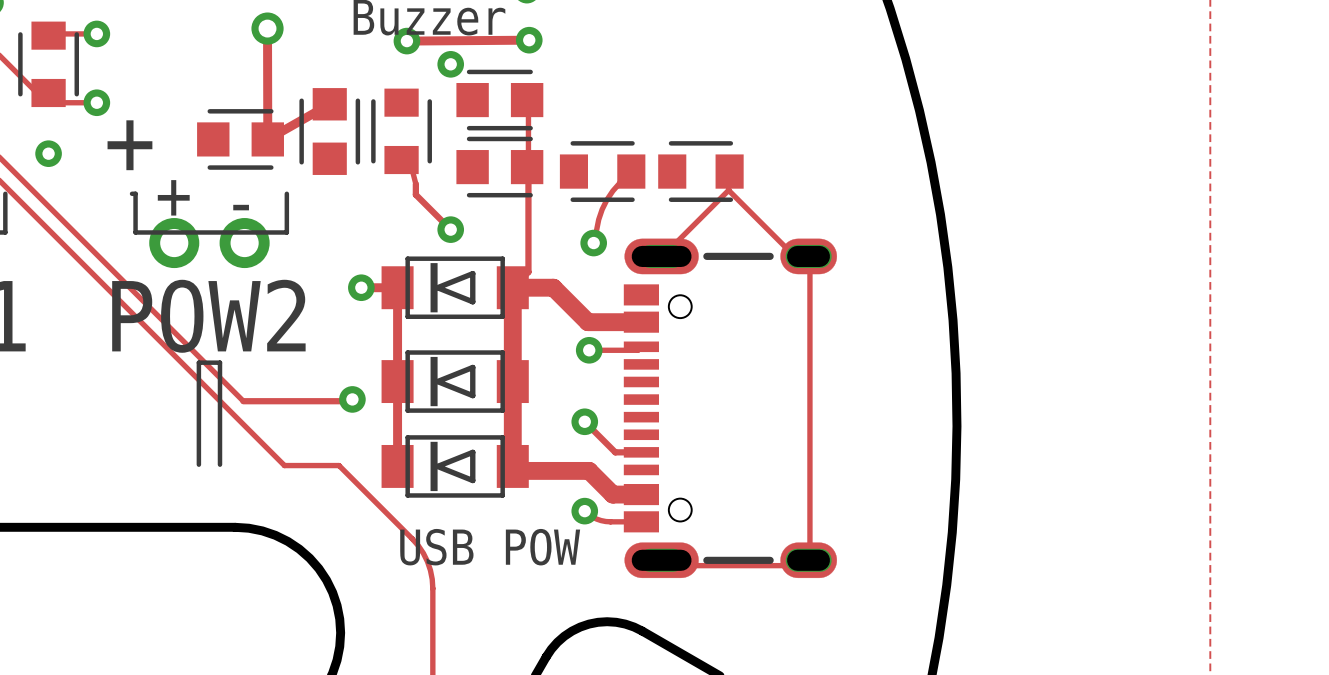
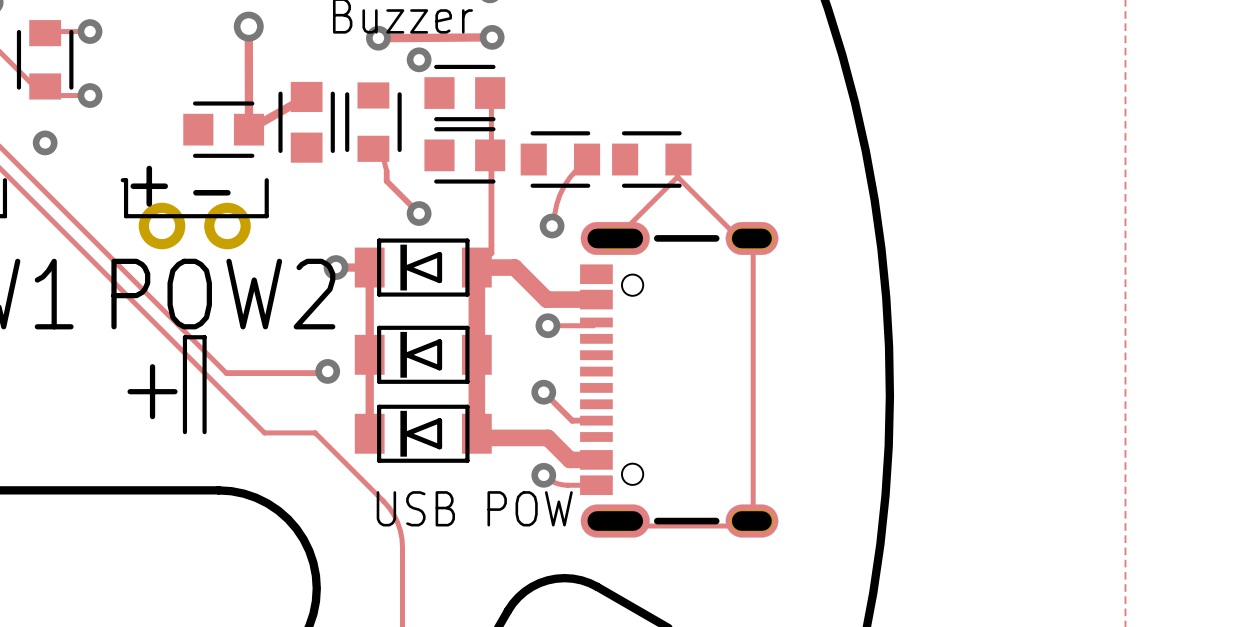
text position: + (129, 145) -> + (152, 391)

